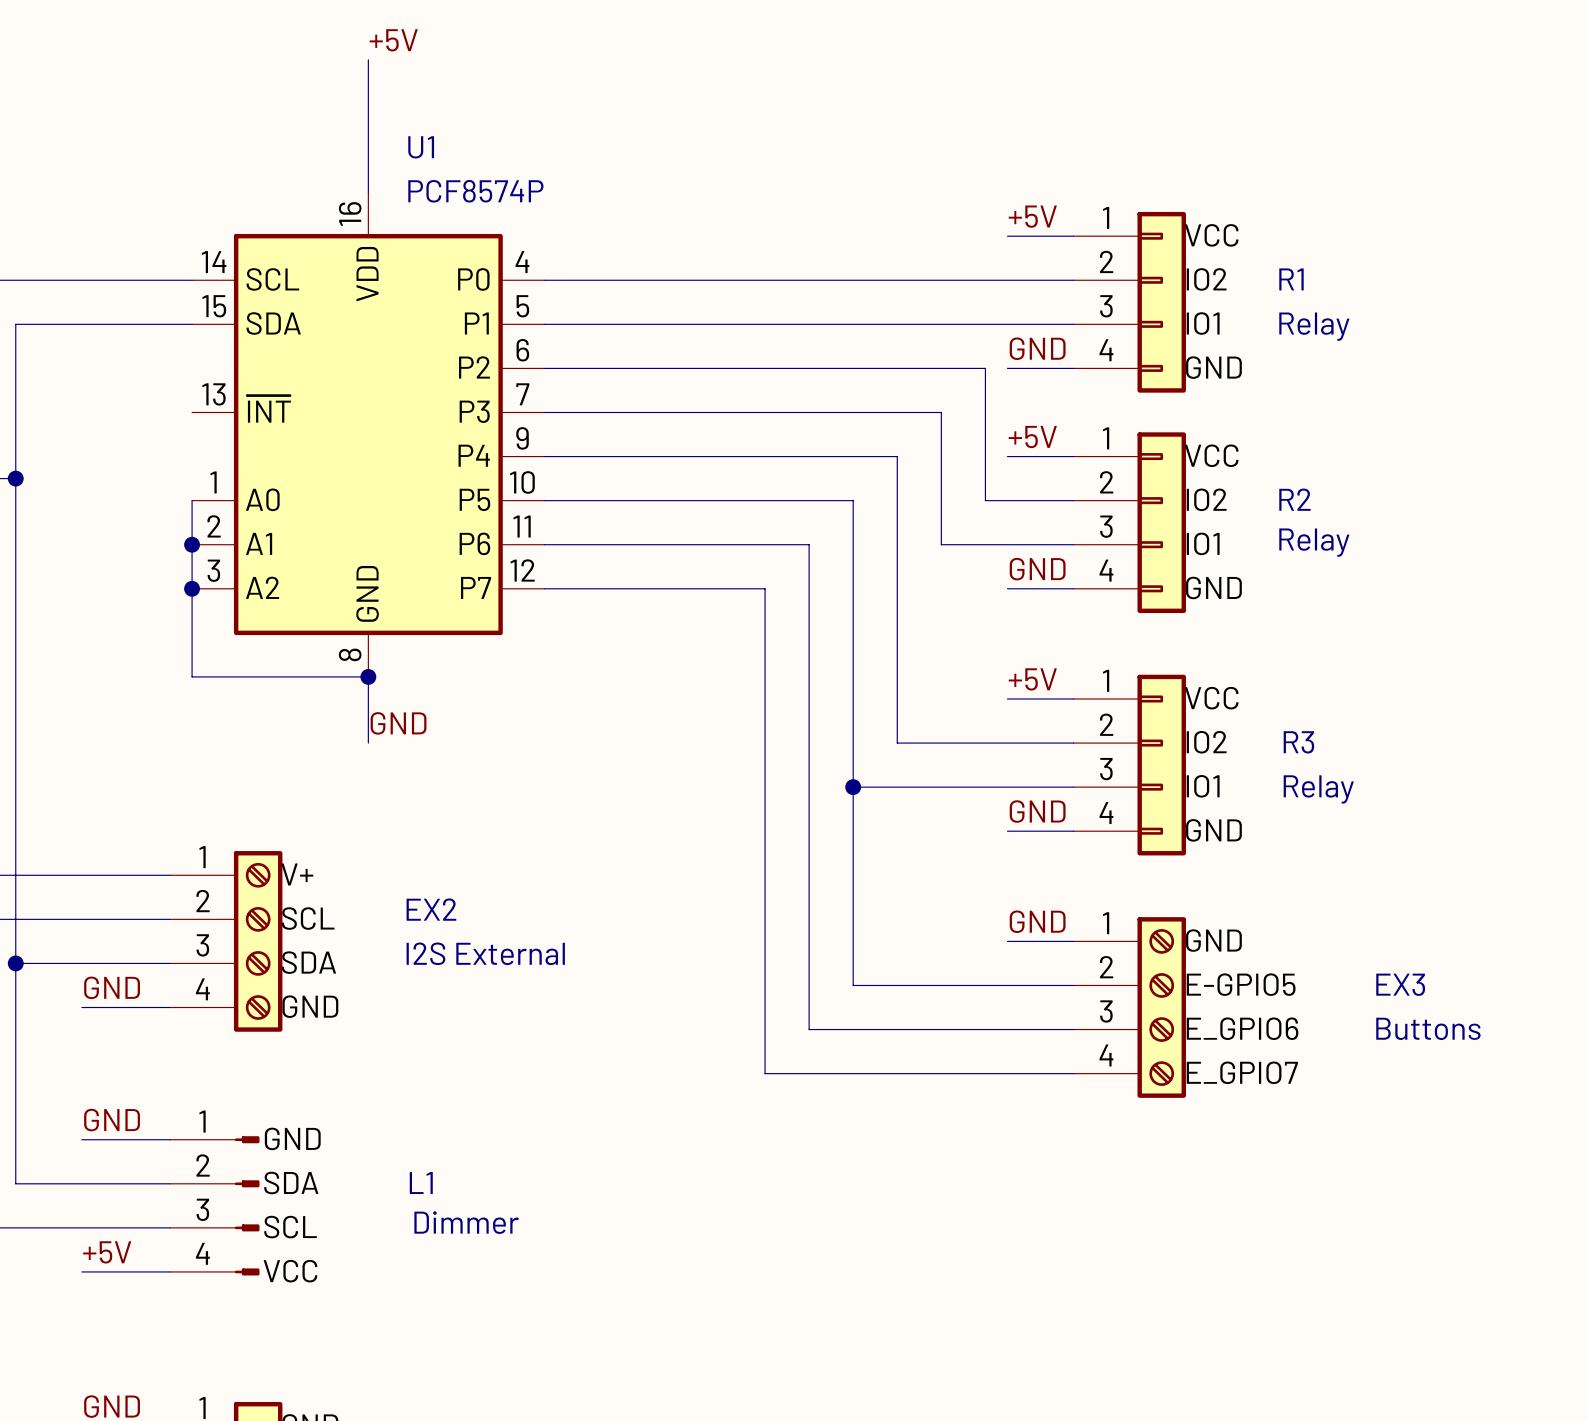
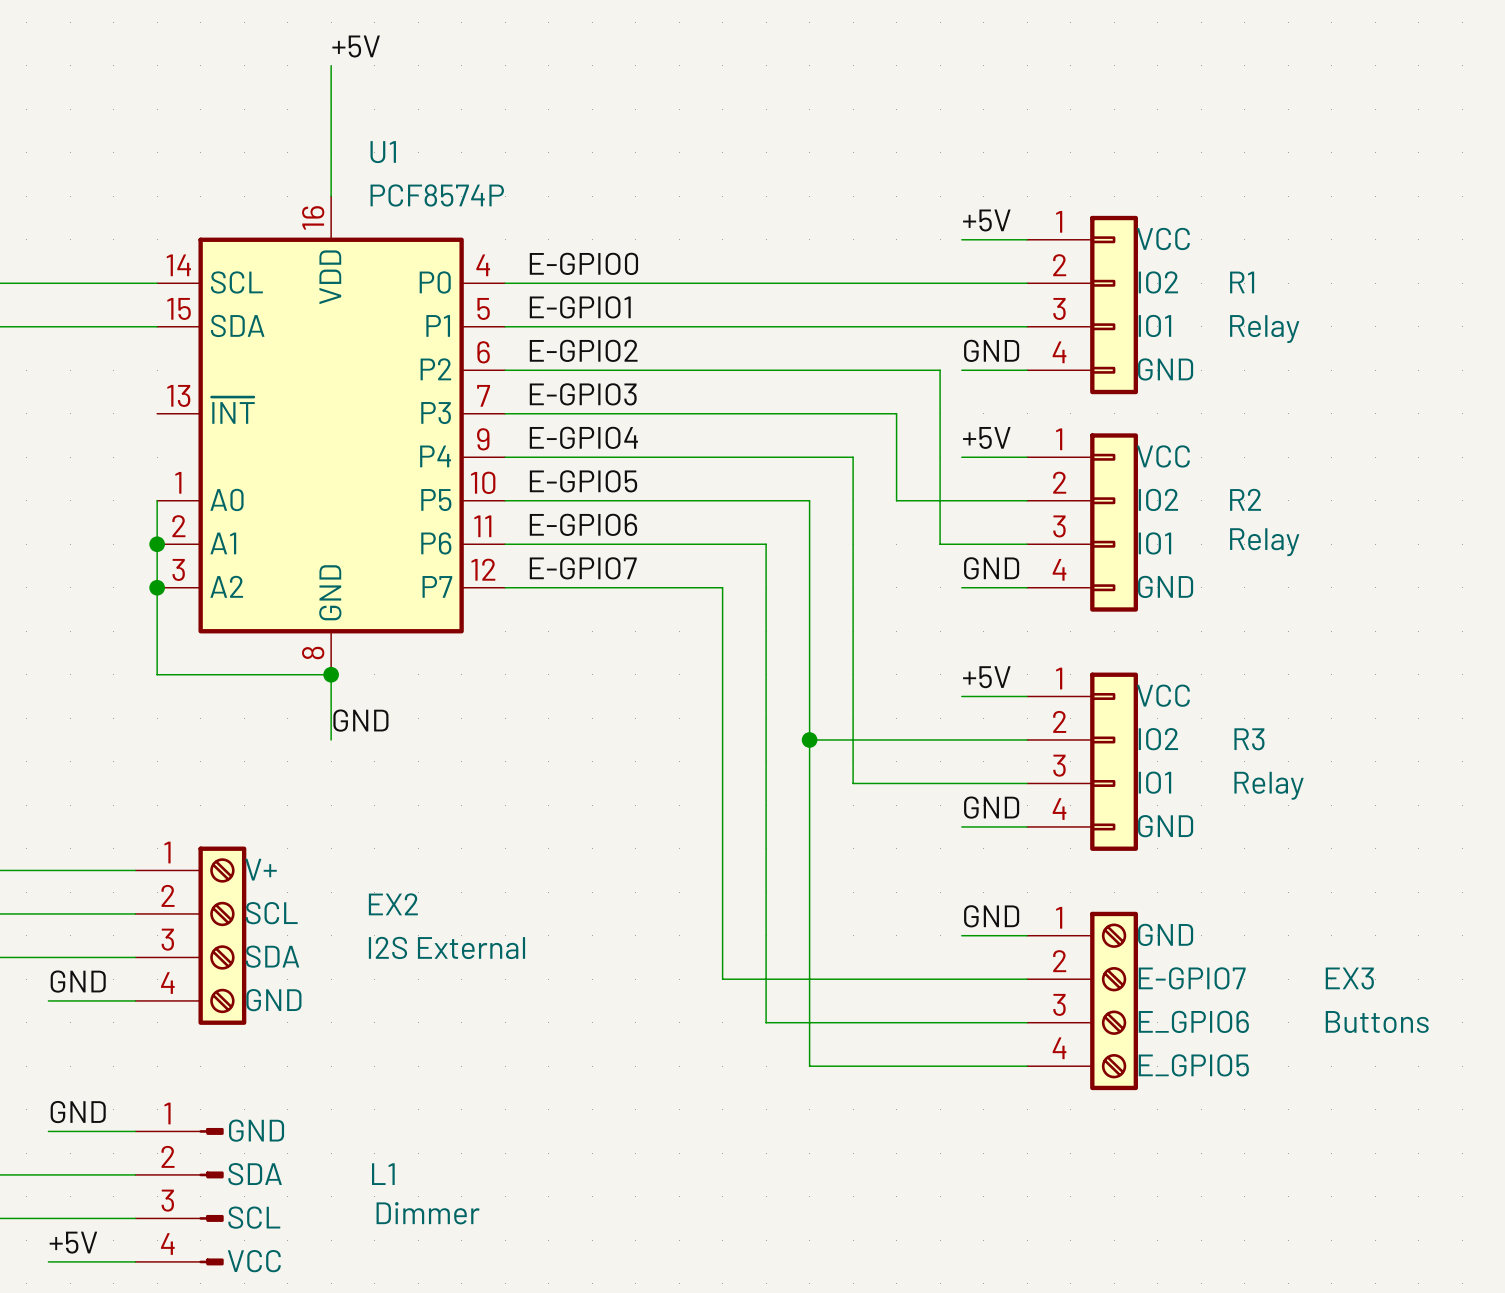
label: none -> E-GPIO0 (583, 263)
label: none -> E-GPIO1 (580, 307)
label: none -> E-GPIO2 (583, 350)
label: none -> E-GPIO3 (583, 394)
label: none -> E-GPIO4 (583, 437)
label: none -> E-GPIO5 (583, 481)
wire: (941, 500) (941, 544) (985, 544) -> (896, 500) (940, 500) (940, 544)
label: none -> E-GPIO6 (583, 524)
label: none -> E-GPIO7 (583, 568)
wire: (853, 787) (897, 787) -> (809, 739) (853, 739) (853, 783)
junction position: (853, 787) -> (809, 739)
EX3 pin name: E-GPIO5 (1241, 984) -> E-GPIO7 (1192, 978)
wire: (765, 985) (765, 1073) (853, 1073) -> (722, 979) (809, 979) (809, 1066)
EX3 pin name: E_GPIO7 (1242, 1072) -> E_GPIO5 (1193, 1065)

